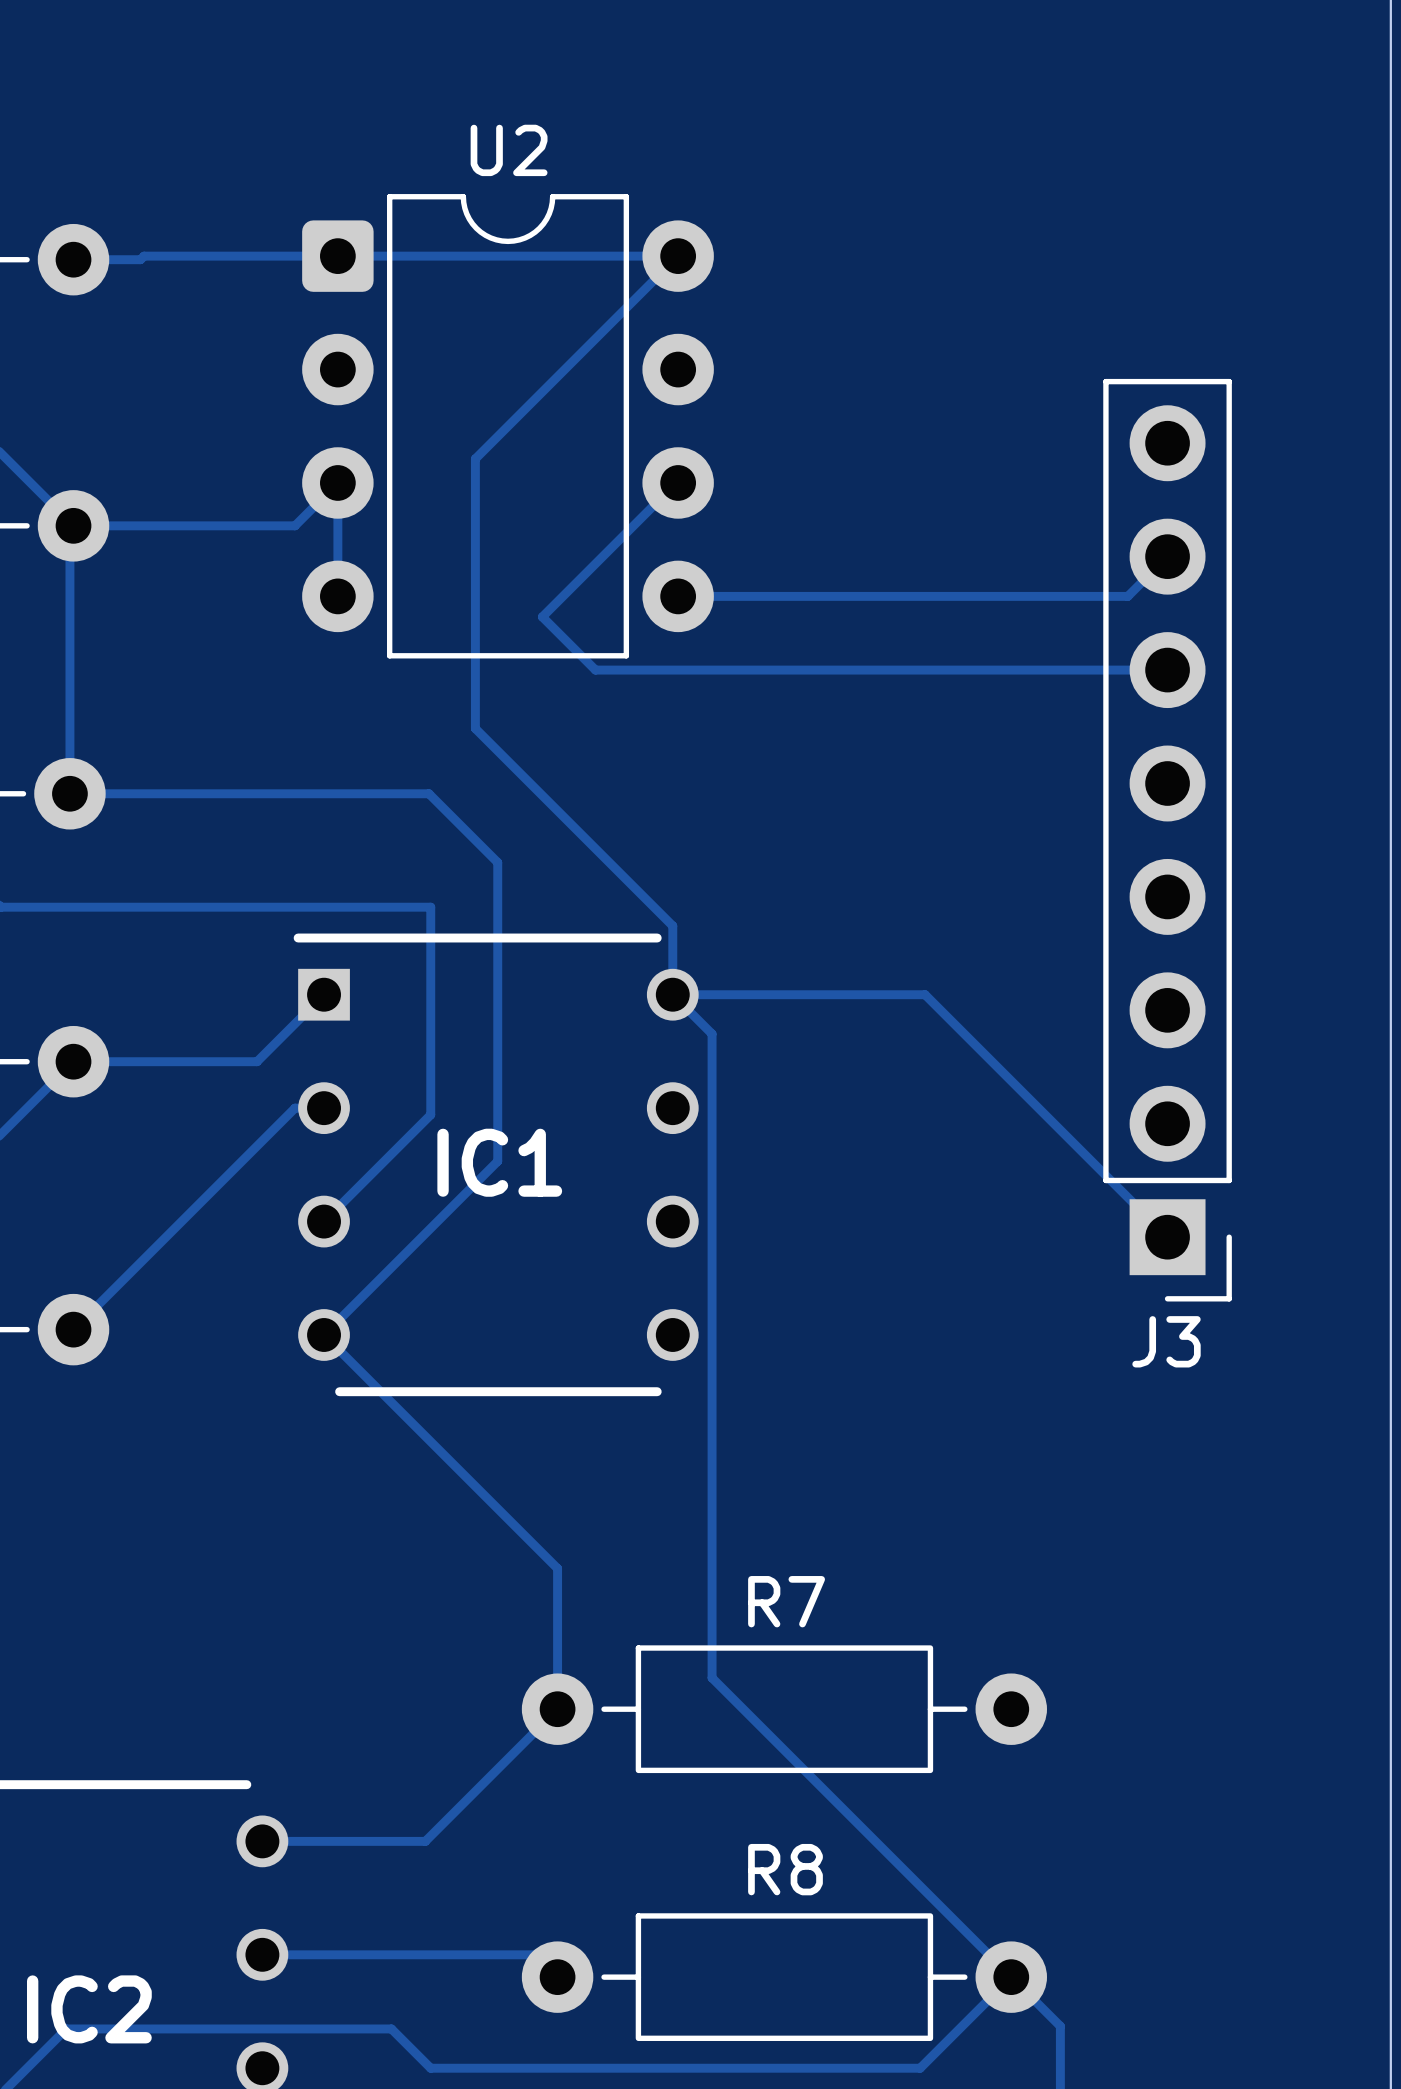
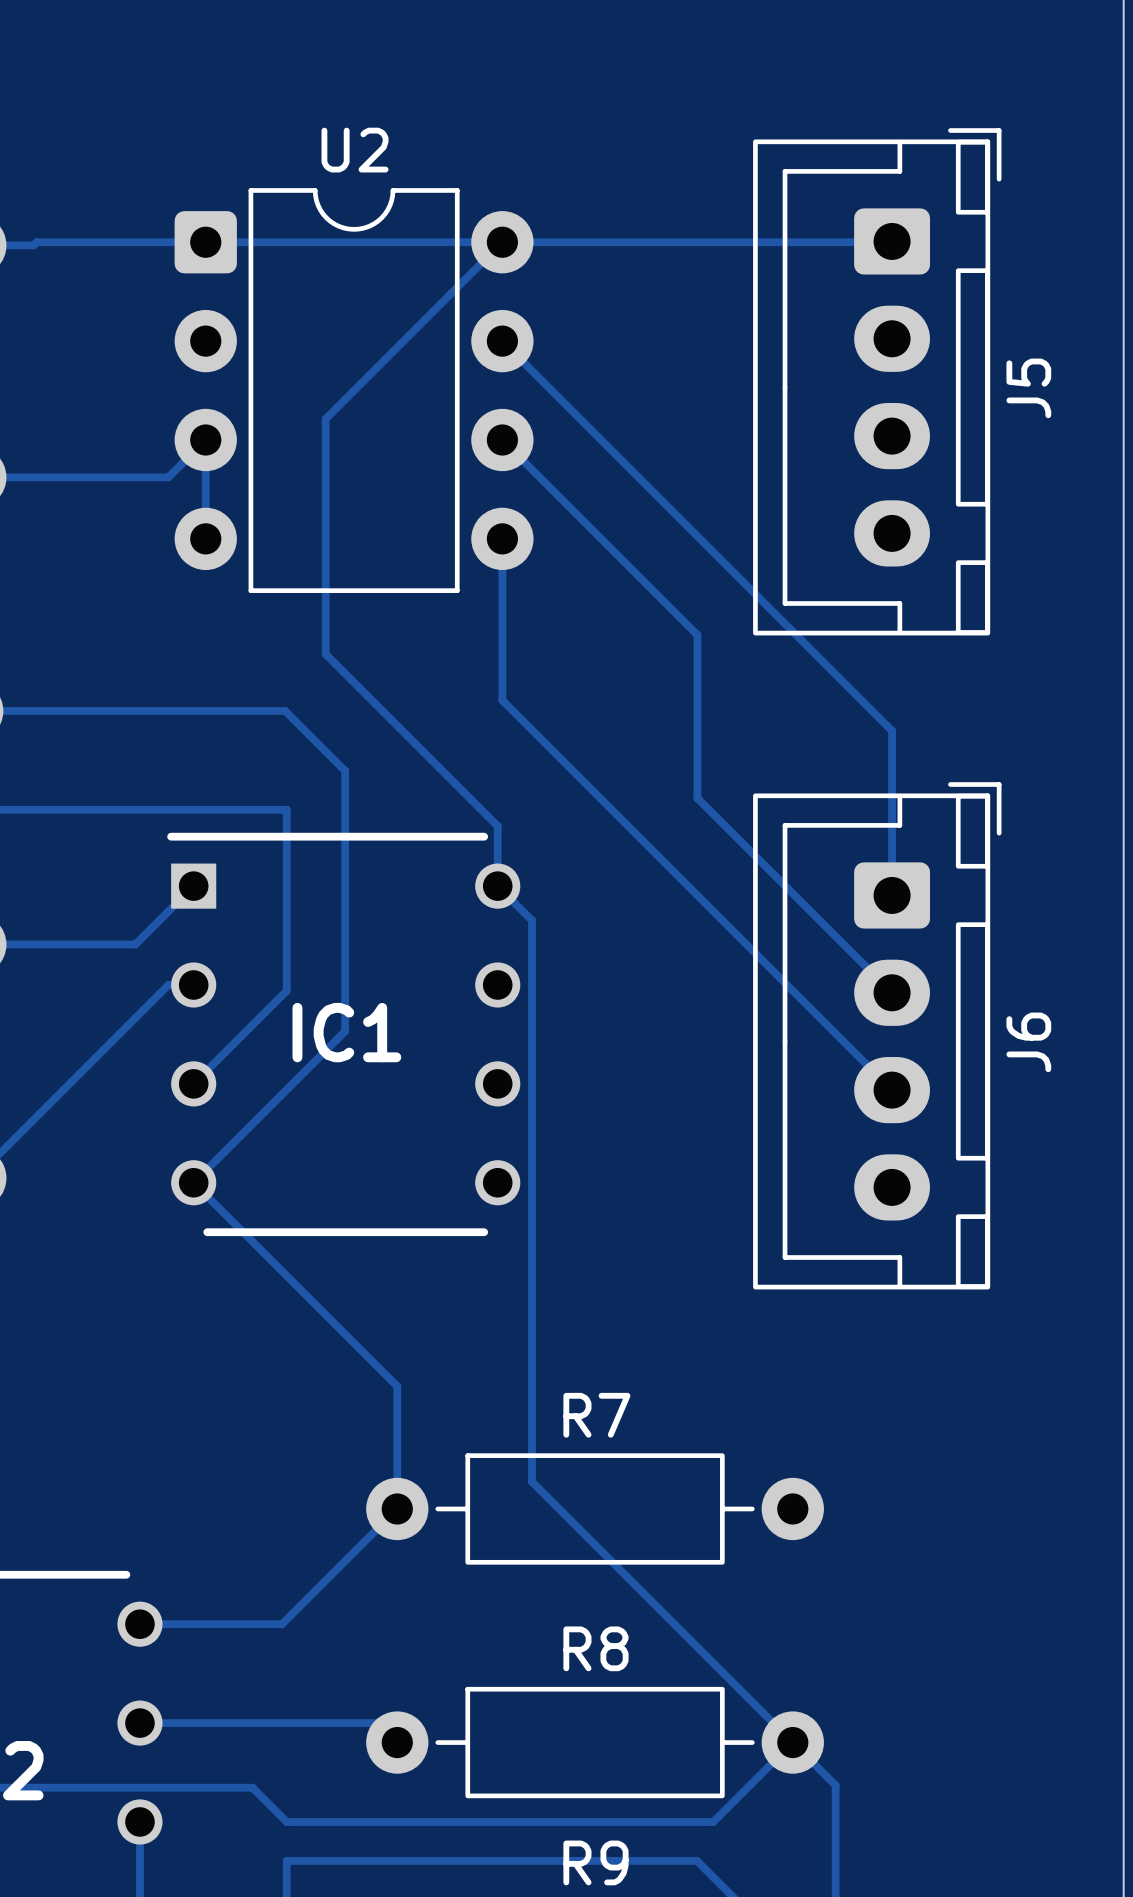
track: none -> (892, 241) (502, 242)
track: none -> (502, 341) (892, 730) (892, 895)
J5: none -> (877, 381)
track: (678, 482) (542, 616) (595, 670) (1167, 670) (1167, 699) -> (502, 439) (697, 635) (697, 798) (892, 992)
track: (1167, 586) (1167, 556) (1127, 596) (678, 596) -> (892, 1090) (502, 700) (502, 538)
J3: (1167, 840) -> none
track: (672, 994) (925, 994) (1167, 1237) -> none
J6: none -> (877, 1035)

